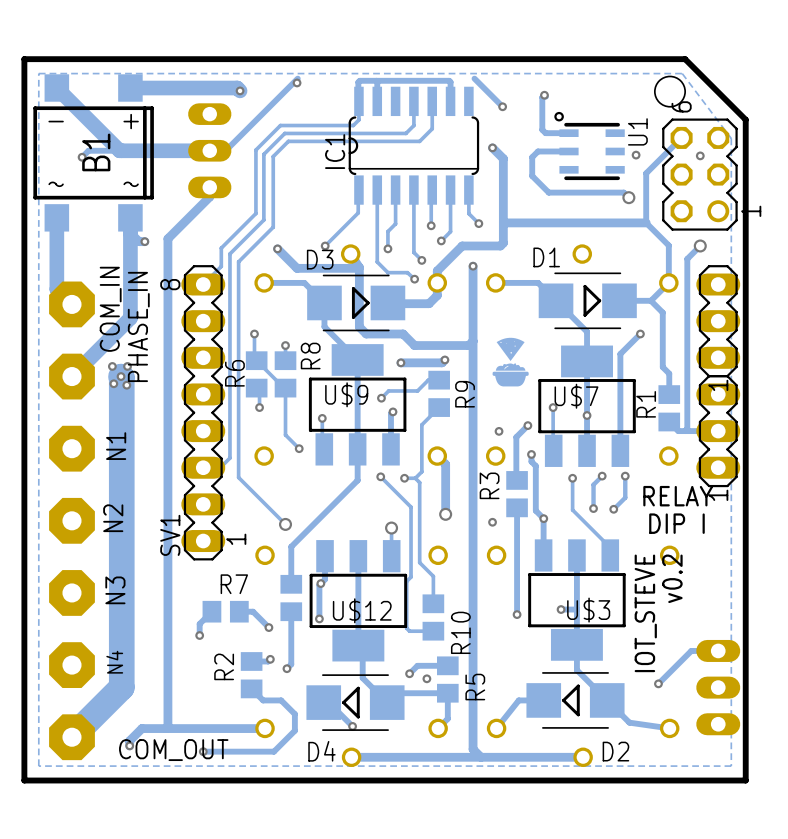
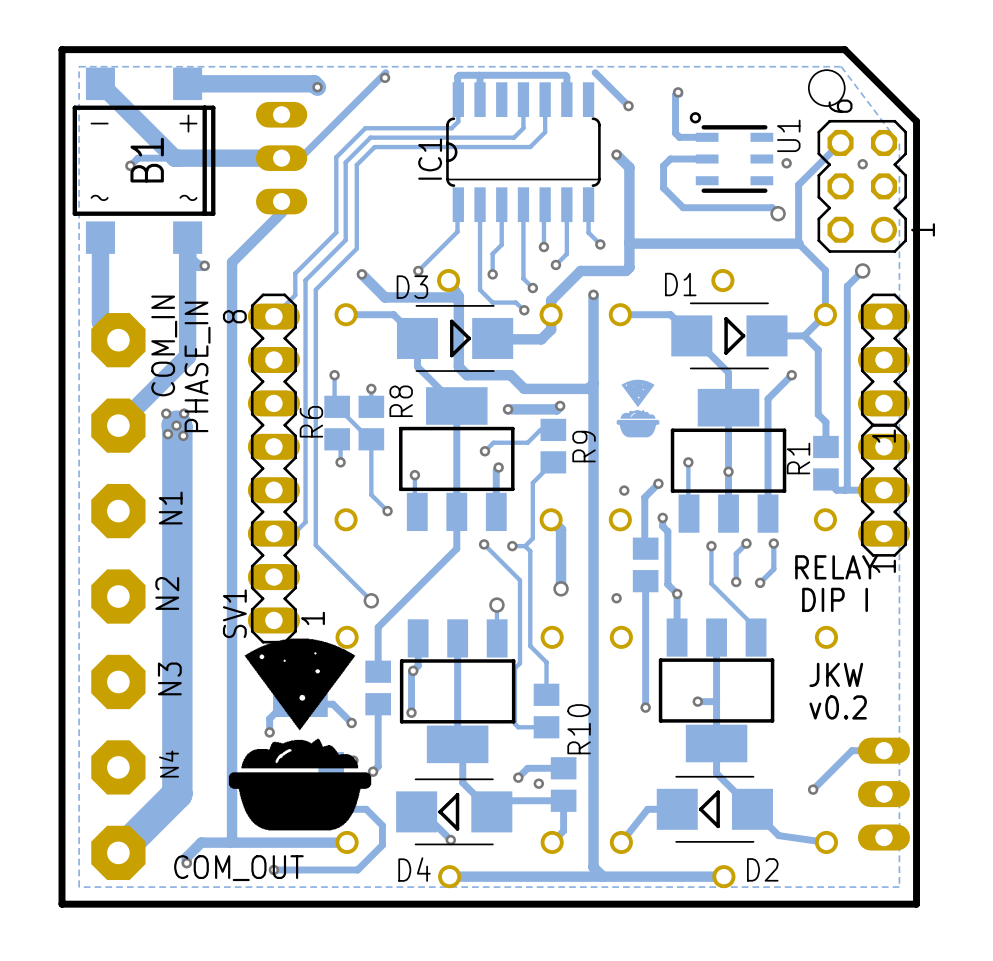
U$9 name: U$9 (346, 394) -> none
U$7 name: U$7 (576, 396) -> none
R3 name: R3 (489, 485) -> none
drawing: none -> [228, 638, 372, 831]
text rotation: 0° (672, 578) -> 90° clockwise (838, 707)
R7 name: R7 (234, 584) -> none
text: none -> JKW (836, 674)
U$12 name: U$12 (362, 610) -> none
U$3 name: U$3 (588, 610) -> none
text: IOT_STEVE (645, 613) -> none
R2 name: R2 (224, 666) -> none
R5 name: R5 (475, 687) -> none

